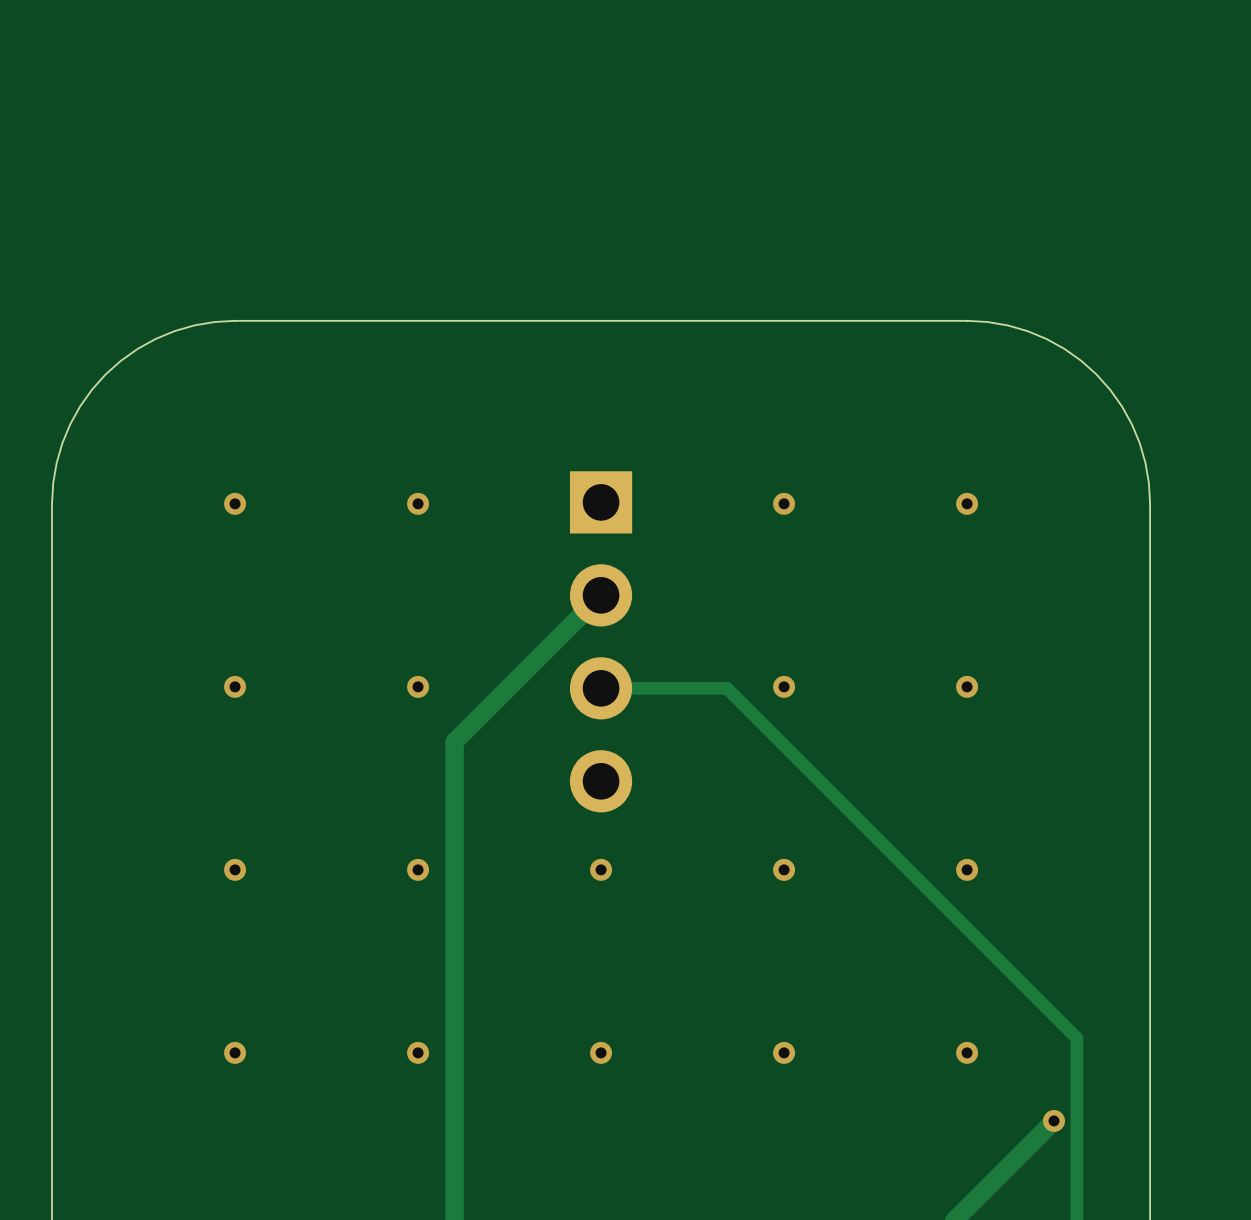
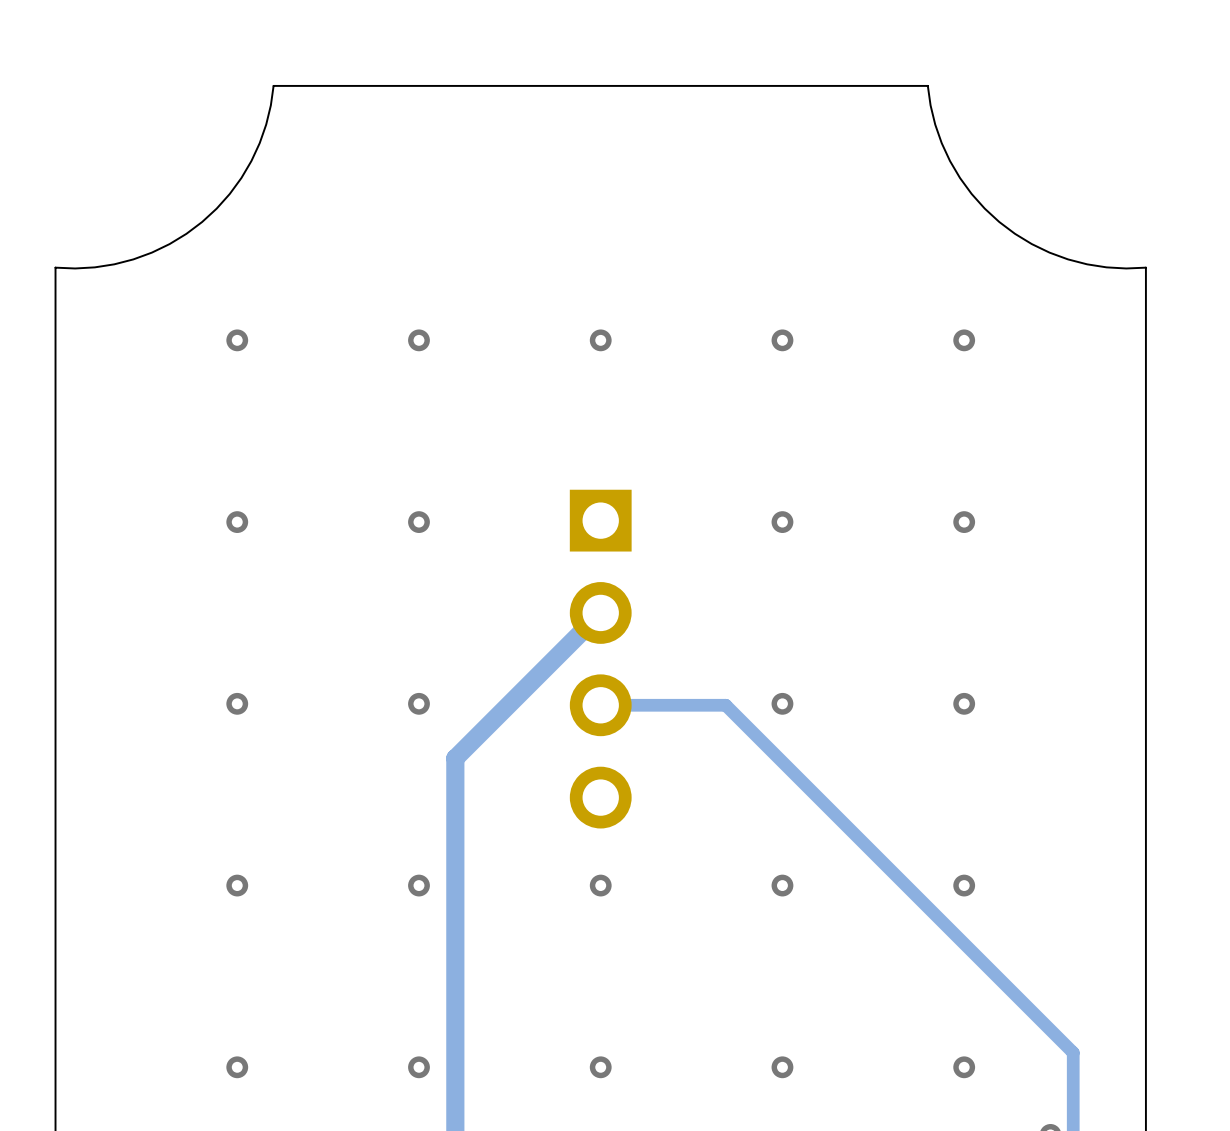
via: none -> (237, 340)
via: none -> (418, 340)
via: none -> (600, 340)
via: none -> (782, 340)
via: none -> (964, 340)
board edge: (1150, 503) (1148, 483) (1139, 443) (1122, 406) (1096, 374) (1064, 348) (1027, 331) (987, 321) (967, 320) (235, 320) (194, 325) (174, 331) (137, 348) (105, 374) (91, 389) (70, 424) (62, 443) (56, 463) (52, 503) -> (1145, 522) (1145, 267) (1106, 267) (1068, 259) (1031, 244) (999, 221) (971, 193) (950, 161) (935, 124) (927, 85) (273, 85) (266, 124) (251, 161) (229, 193) (202, 221) (169, 244) (133, 259) (94, 267) (55, 267) (55, 522)

